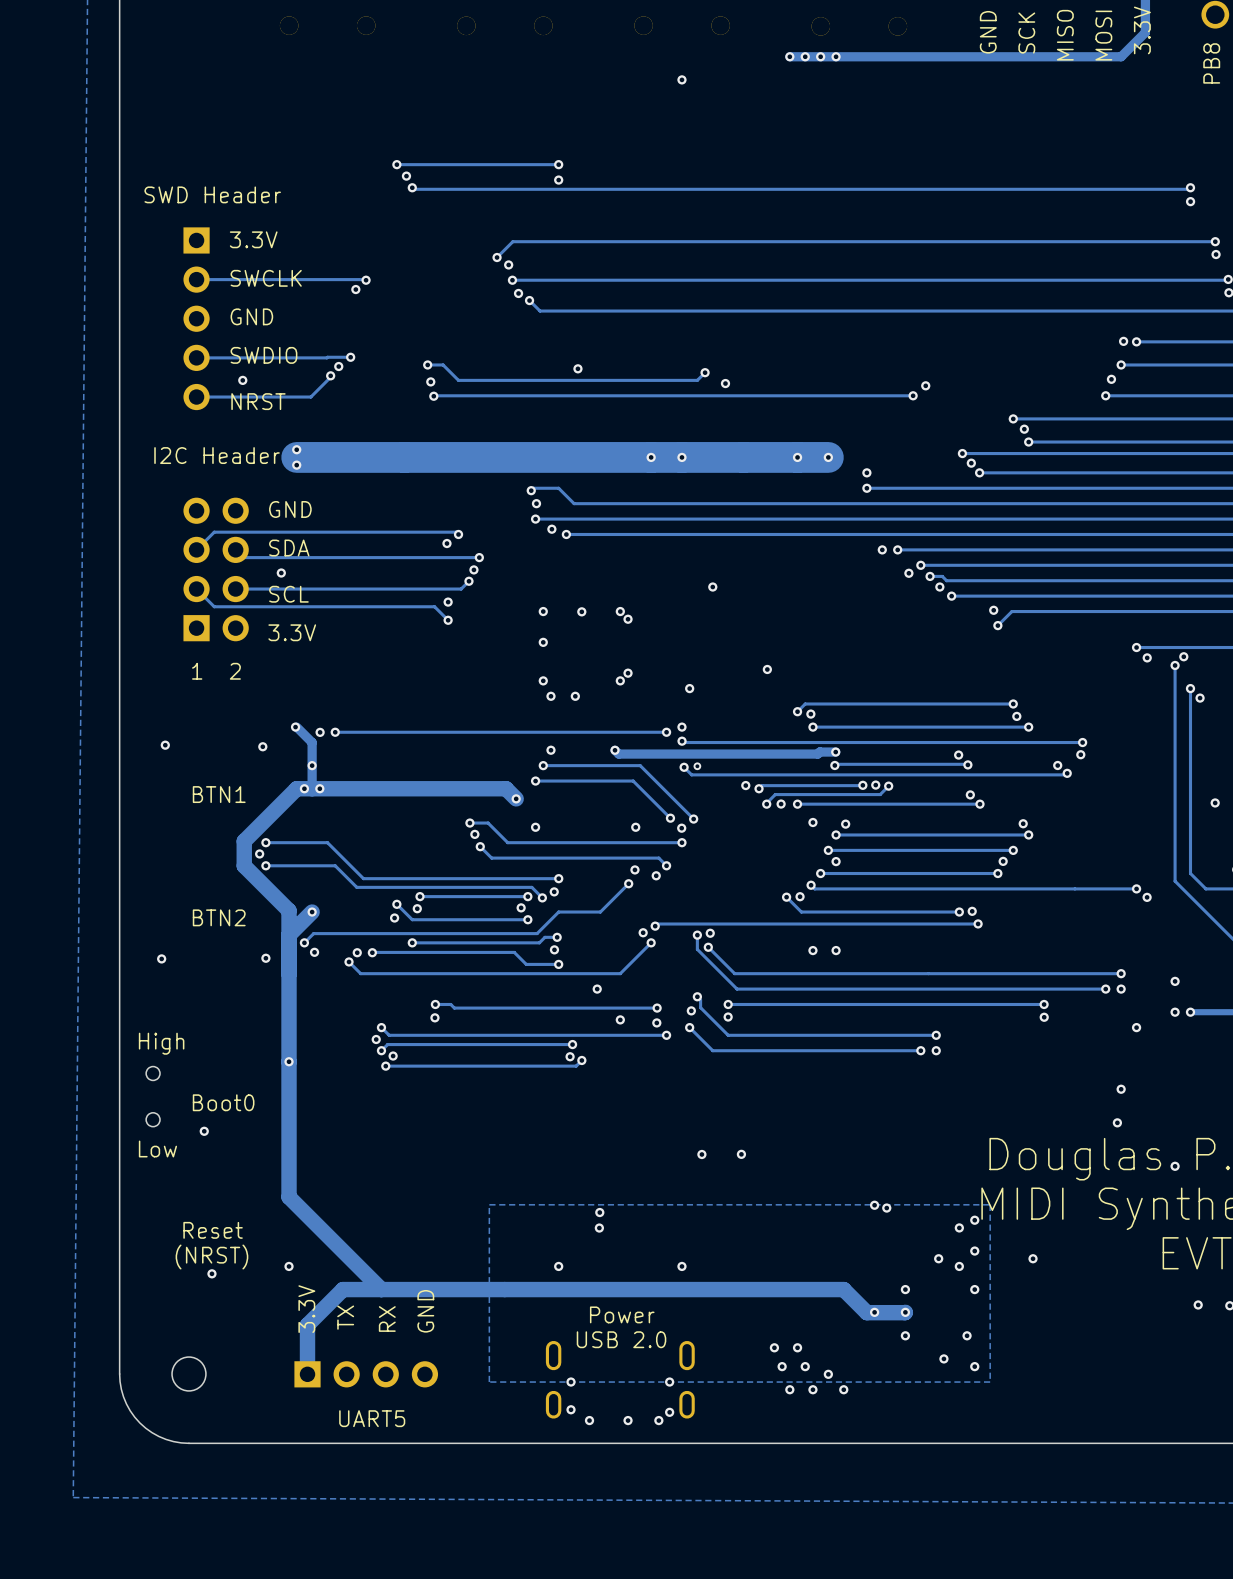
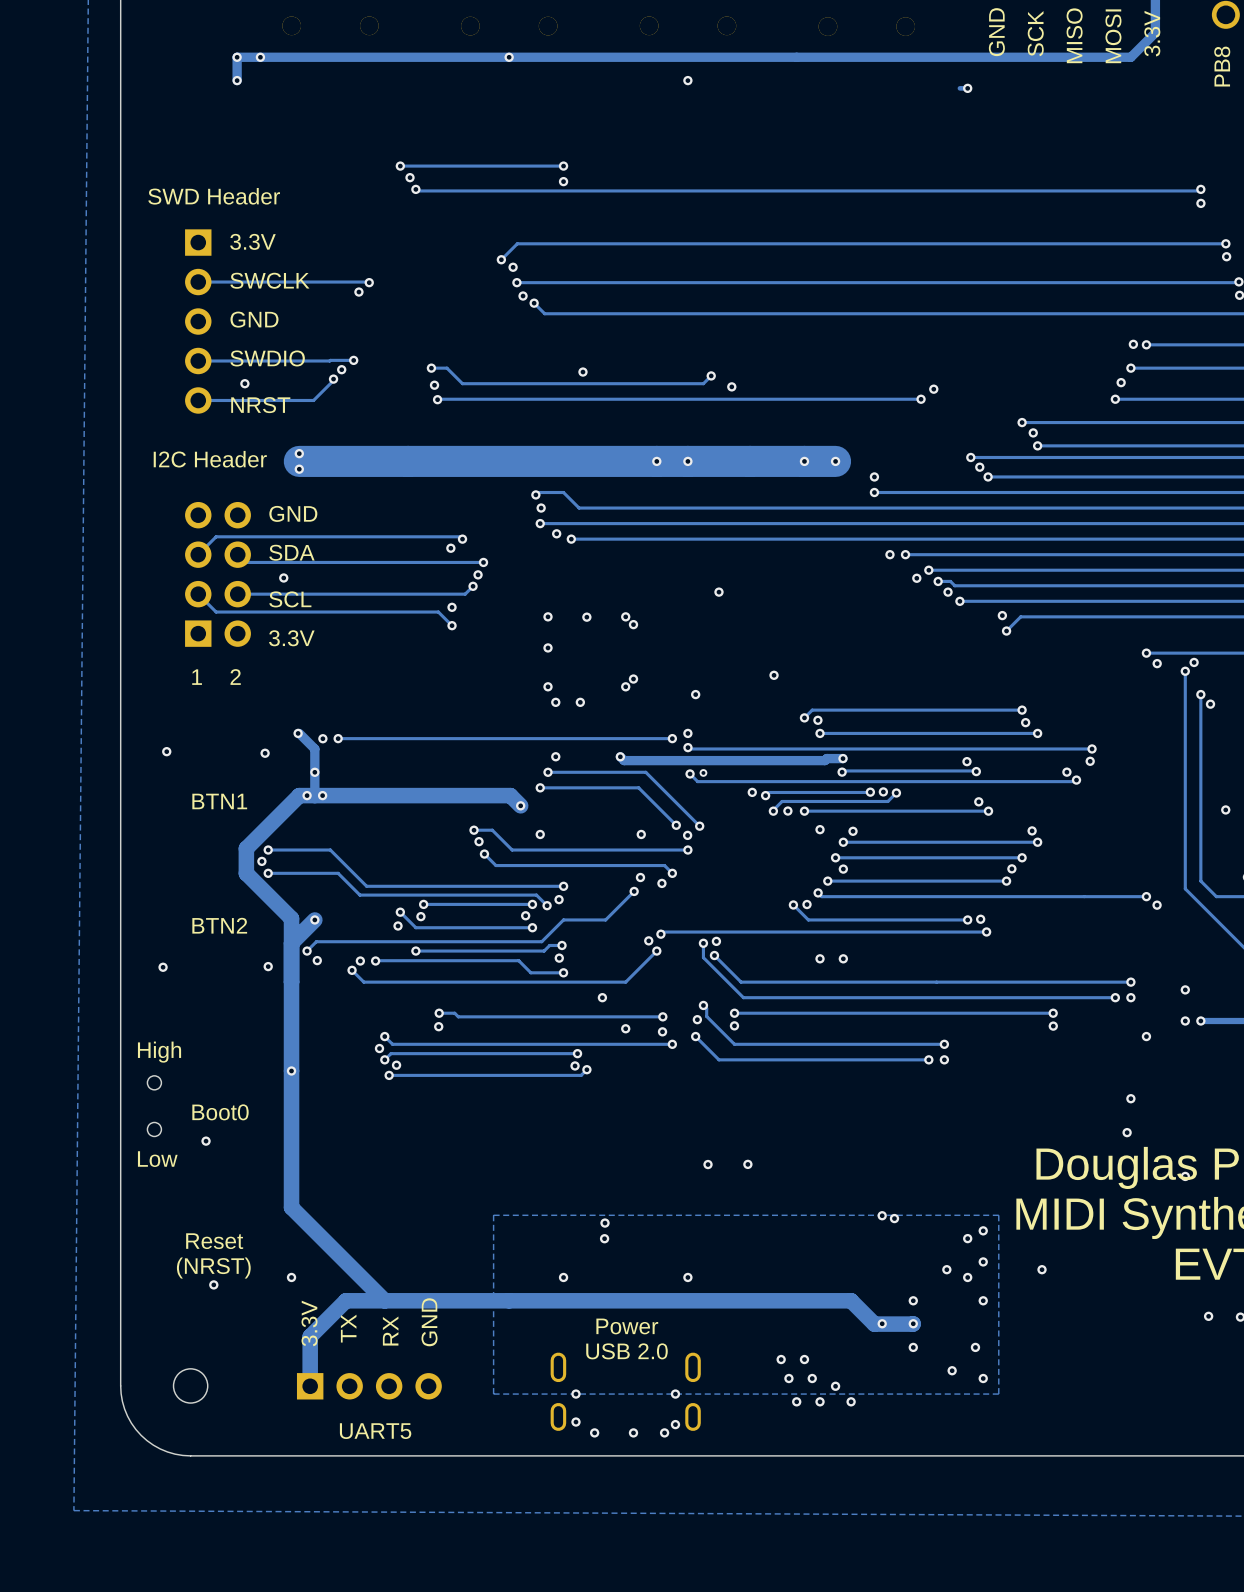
via: none -> (237, 57)
via: none -> (260, 57)
via: none -> (509, 57)
track: none -> (796, 57) (237, 57) (237, 80)
via: (789, 56) -> none
via: (805, 56) -> none
via: (820, 56) -> none
via: (836, 56) -> none
via: none -> (237, 80)
track: none -> (967, 88) (959, 88)
via: none -> (967, 88)

